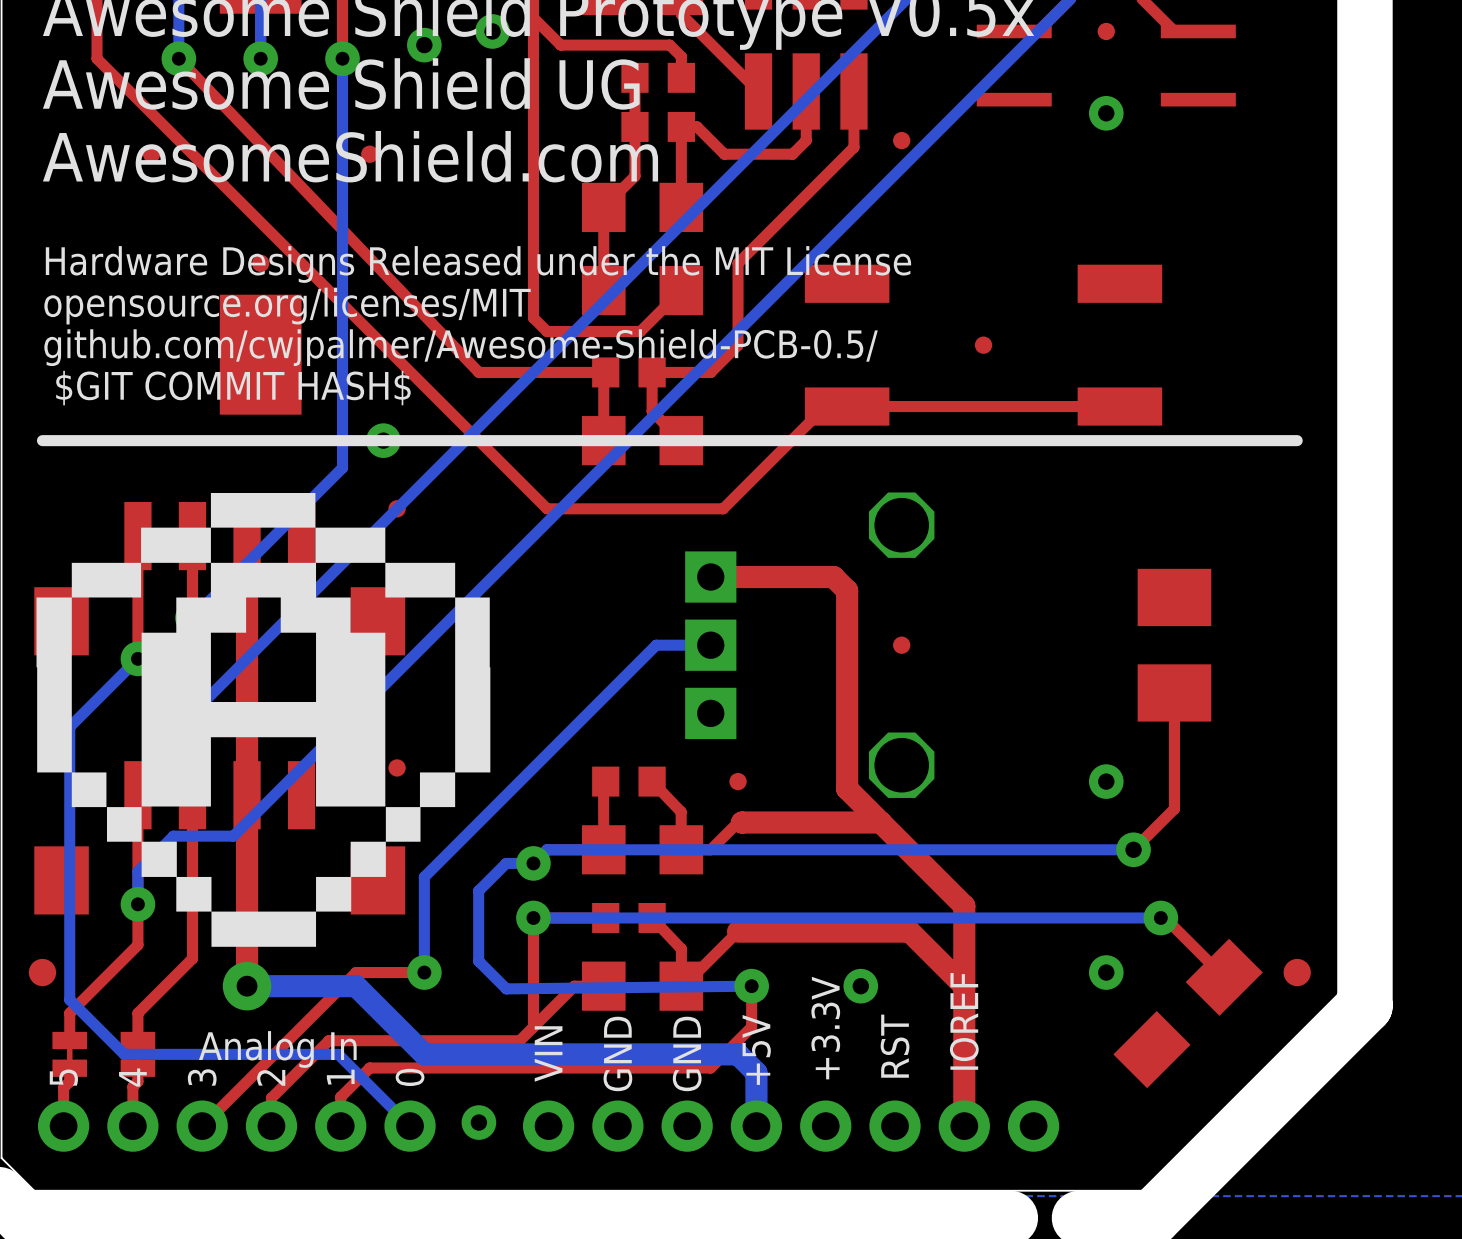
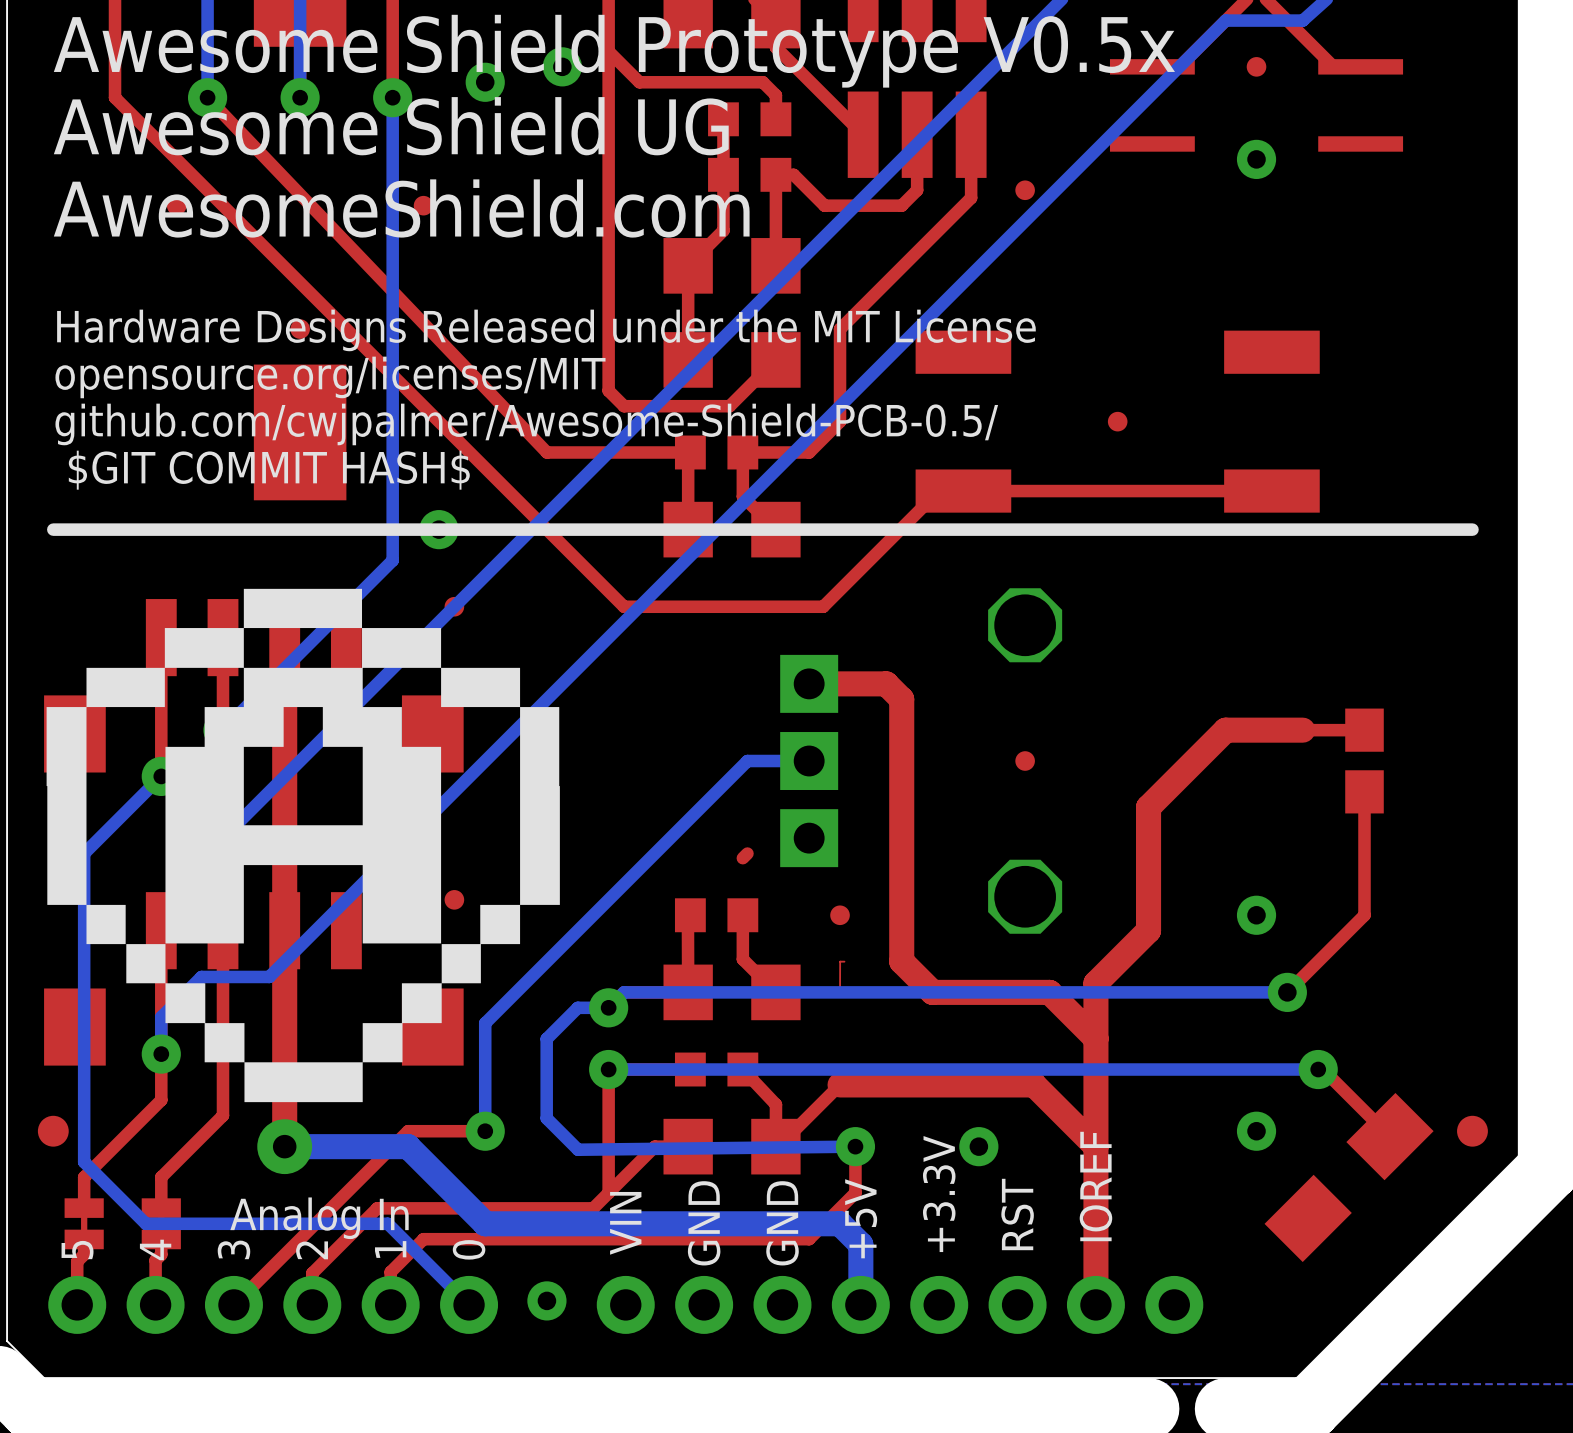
part footprint: [1137, 568, 1212, 722] -> [1345, 708, 1384, 814]
top track: (778, 577) (833, 577) (847, 590) (847, 788) (964, 905) -> (886, 683) (901, 699) (901, 961) (932, 992) (1049, 992) (1095, 1038)
top track: none -> (1364, 730) (1225, 730) (1148, 807) (1148, 930) (1095, 983) (1095, 1055)
top track: (1174, 692) (1174, 808) -> (1364, 791) (1364, 915) (1333, 946)
top track: none -> (747, 853) (742, 858)
top track: (651, 780) (681, 811) (681, 849) (710, 849) (738, 822) -> (742, 915) (742, 959) (775, 992)
top track: none -> (840, 961) (840, 992)
top track: (880, 822) (742, 822) -> none

